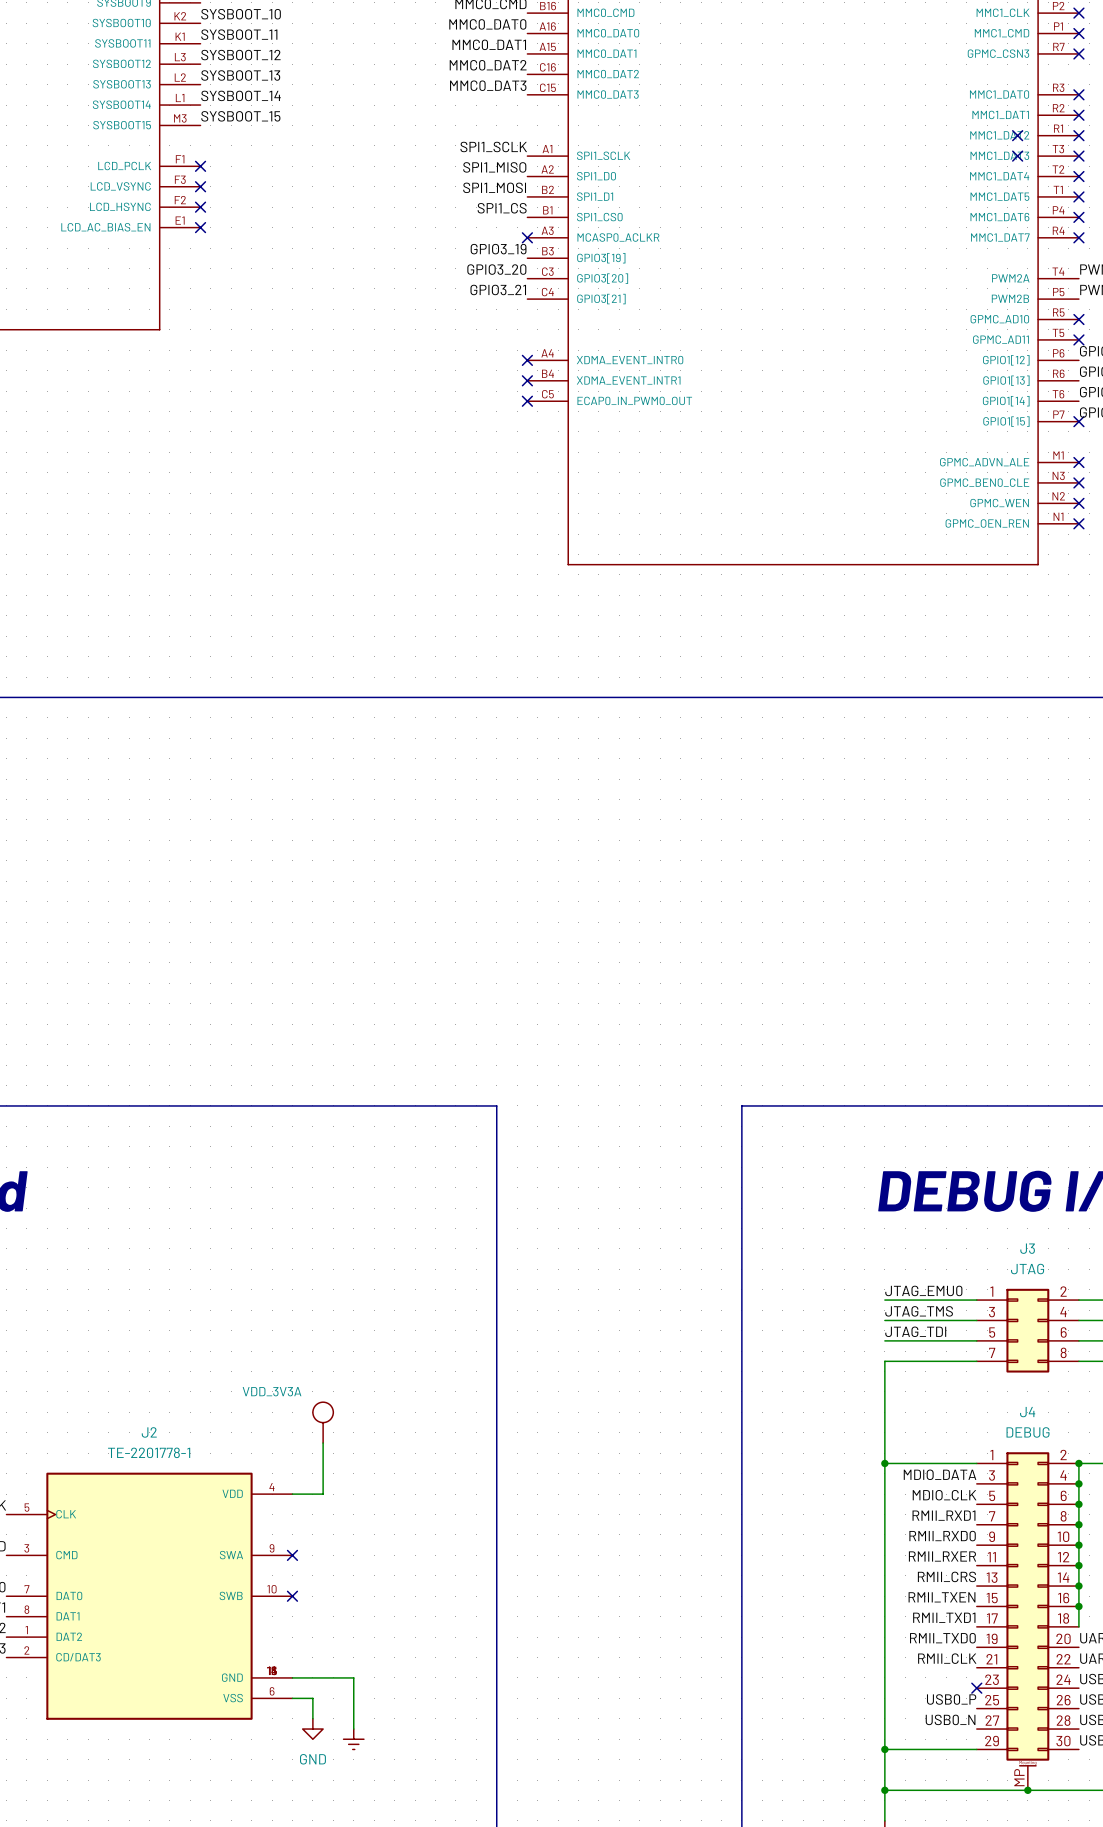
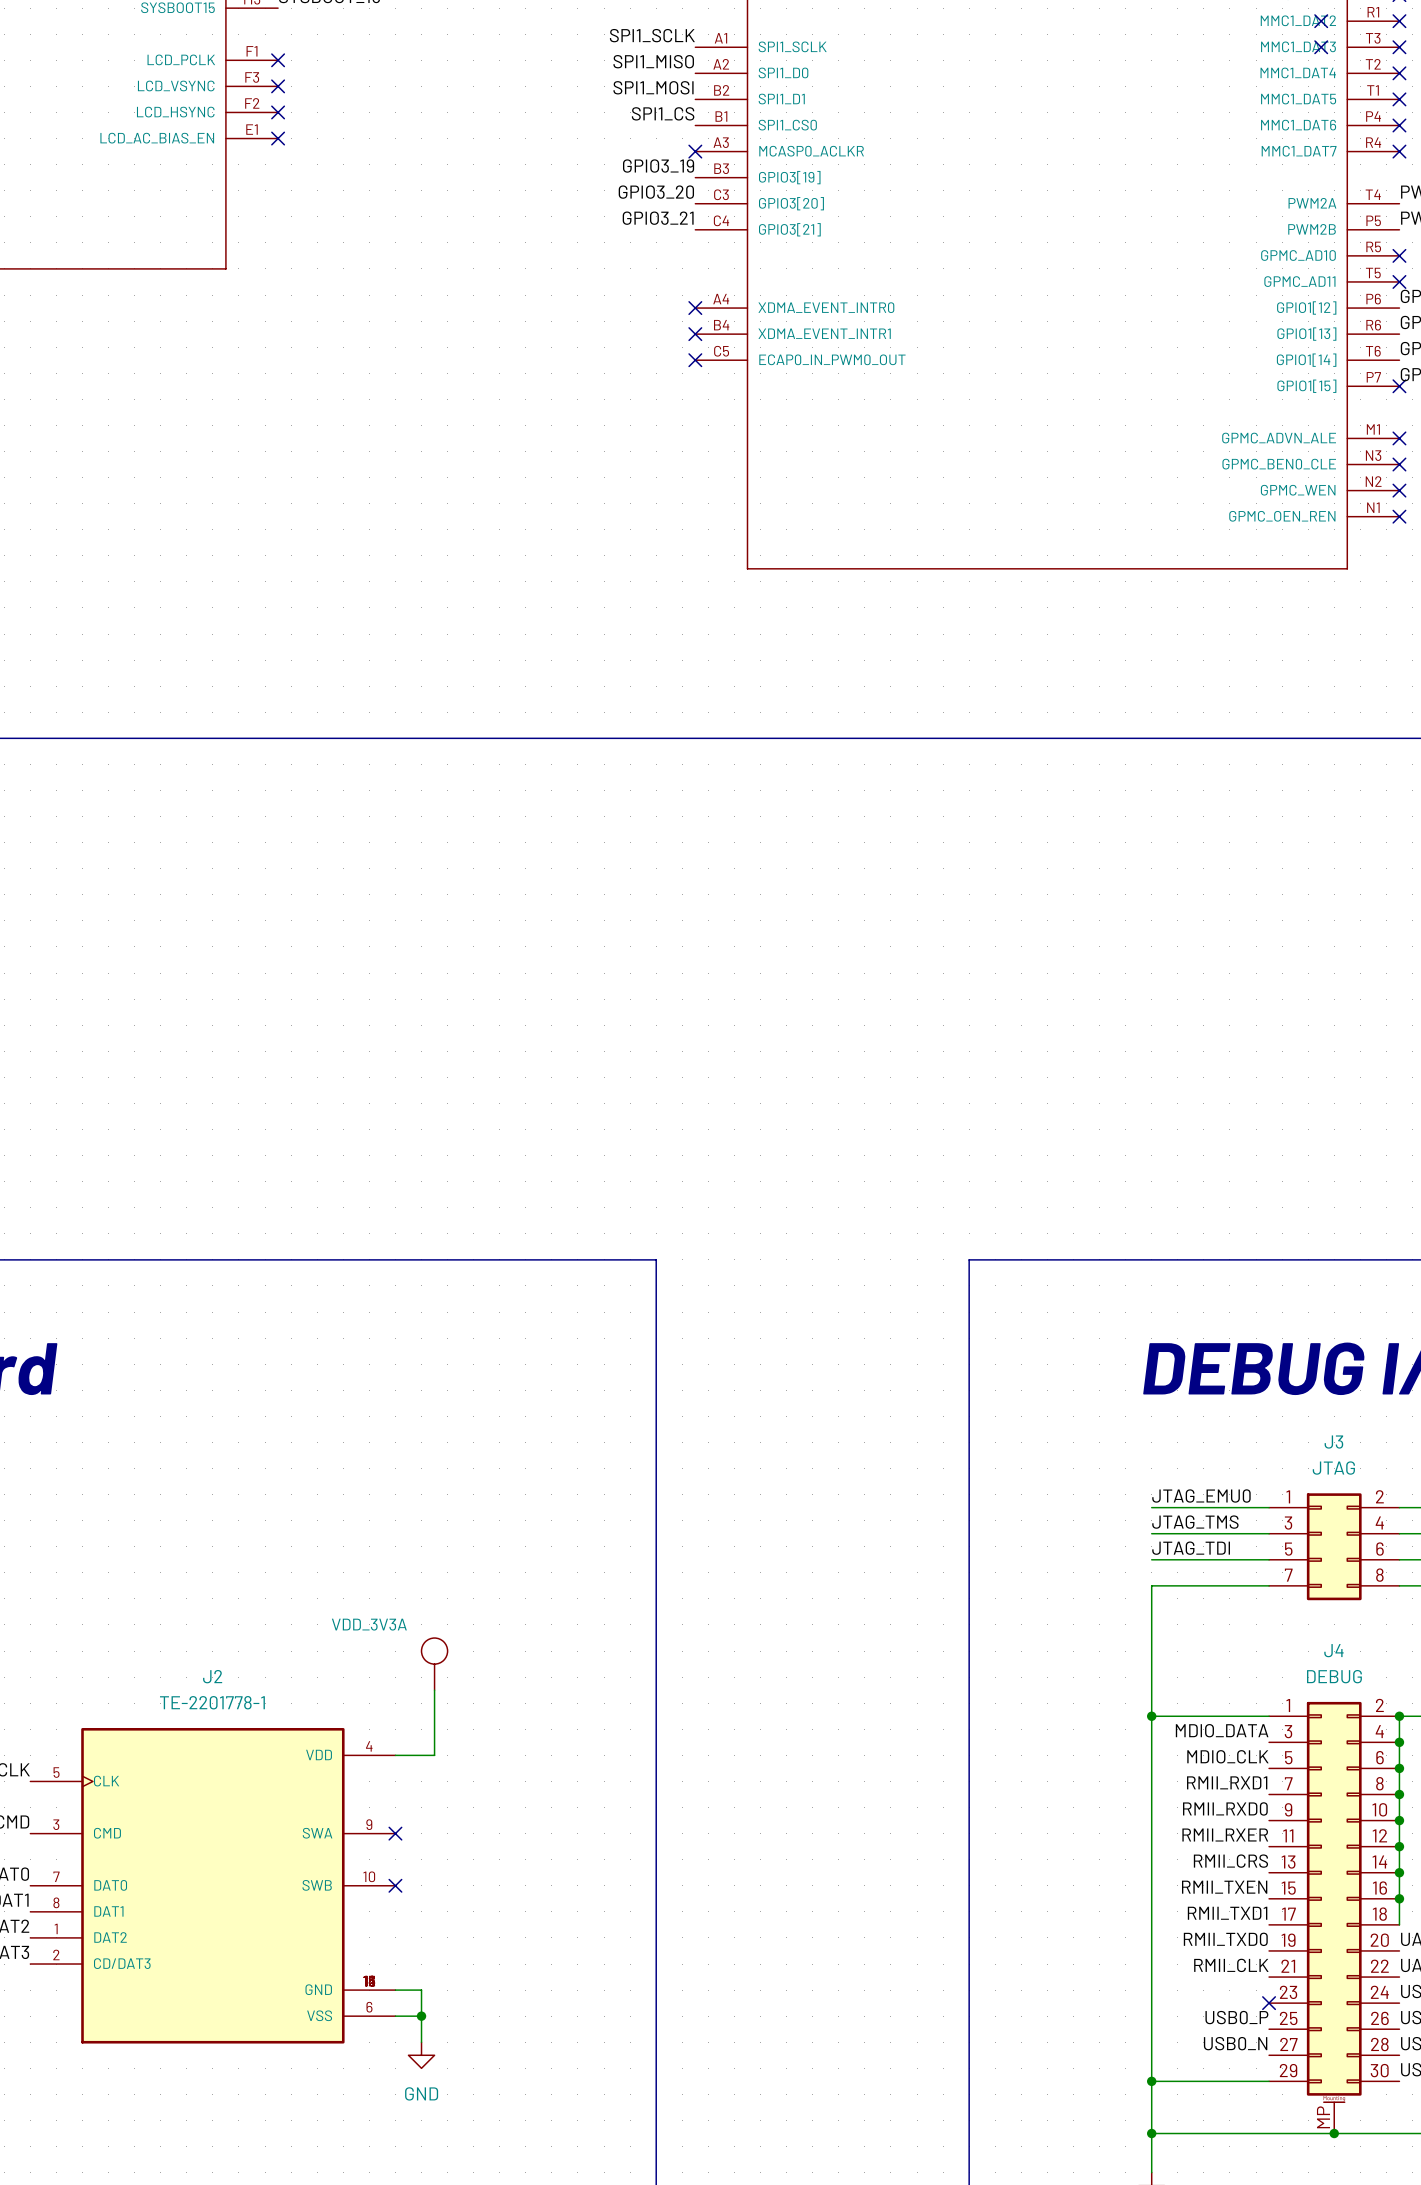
wire: (312, 1677) (353, 1677) (353, 1729) -> (421, 1990) (421, 2016)
junction: none -> (421, 2016)
power symbol: (353, 1739) -> none

